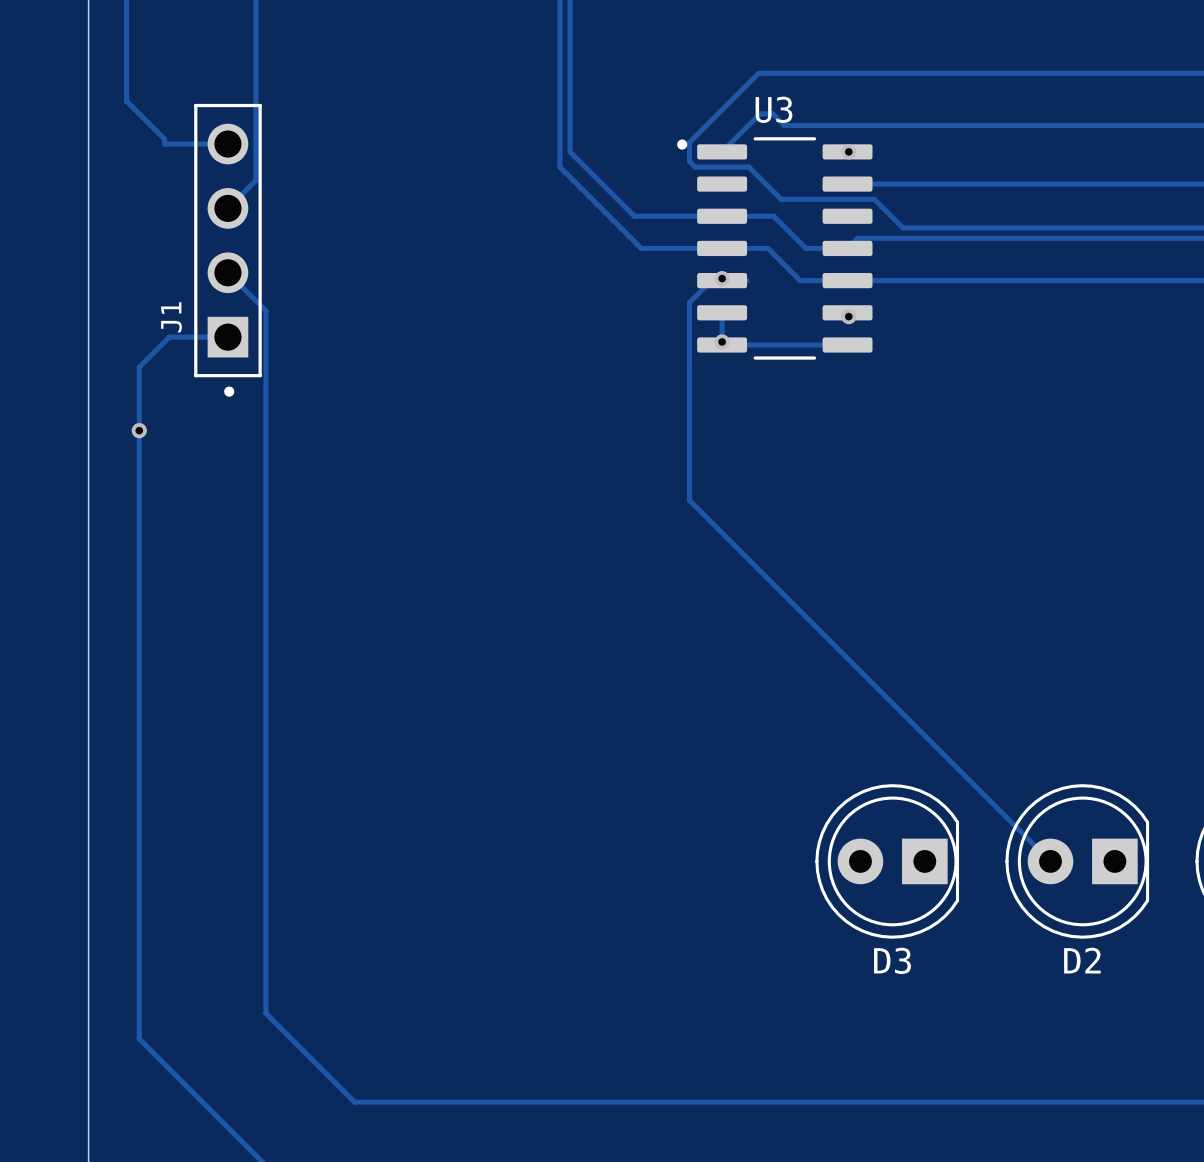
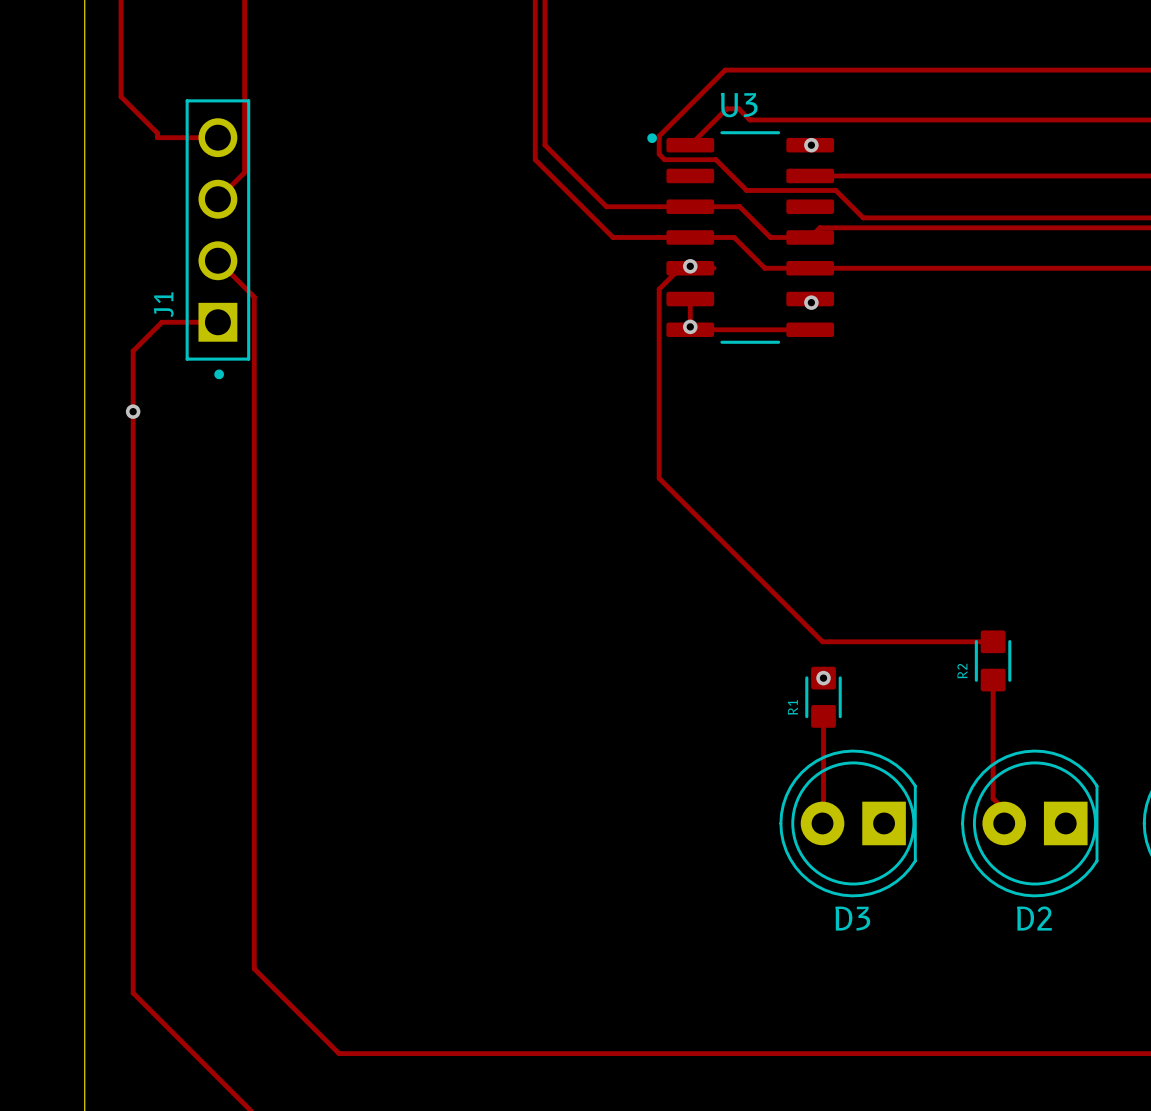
track: (860, 671) (1050, 861) -> (822, 641) (993, 641)
R2: none -> (993, 660)
via: none -> (823, 678)
track: none -> (993, 680) (993, 798) (1011, 816)
R1: none -> (823, 697)
track: none -> (823, 716) (822, 823)

